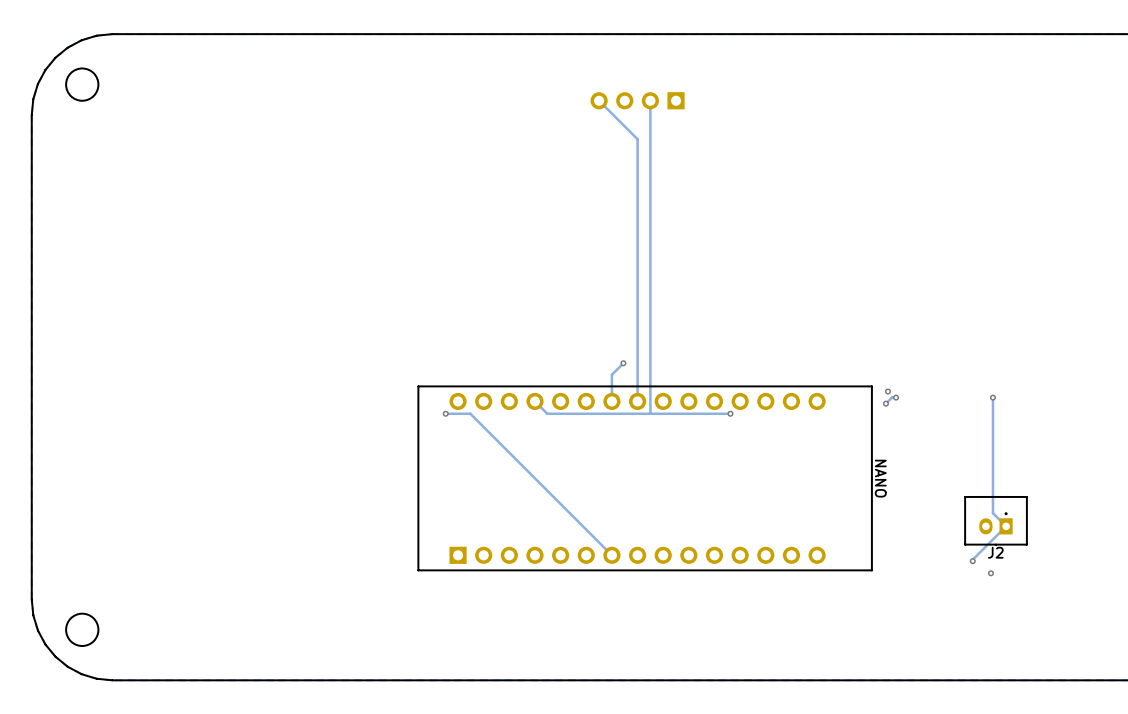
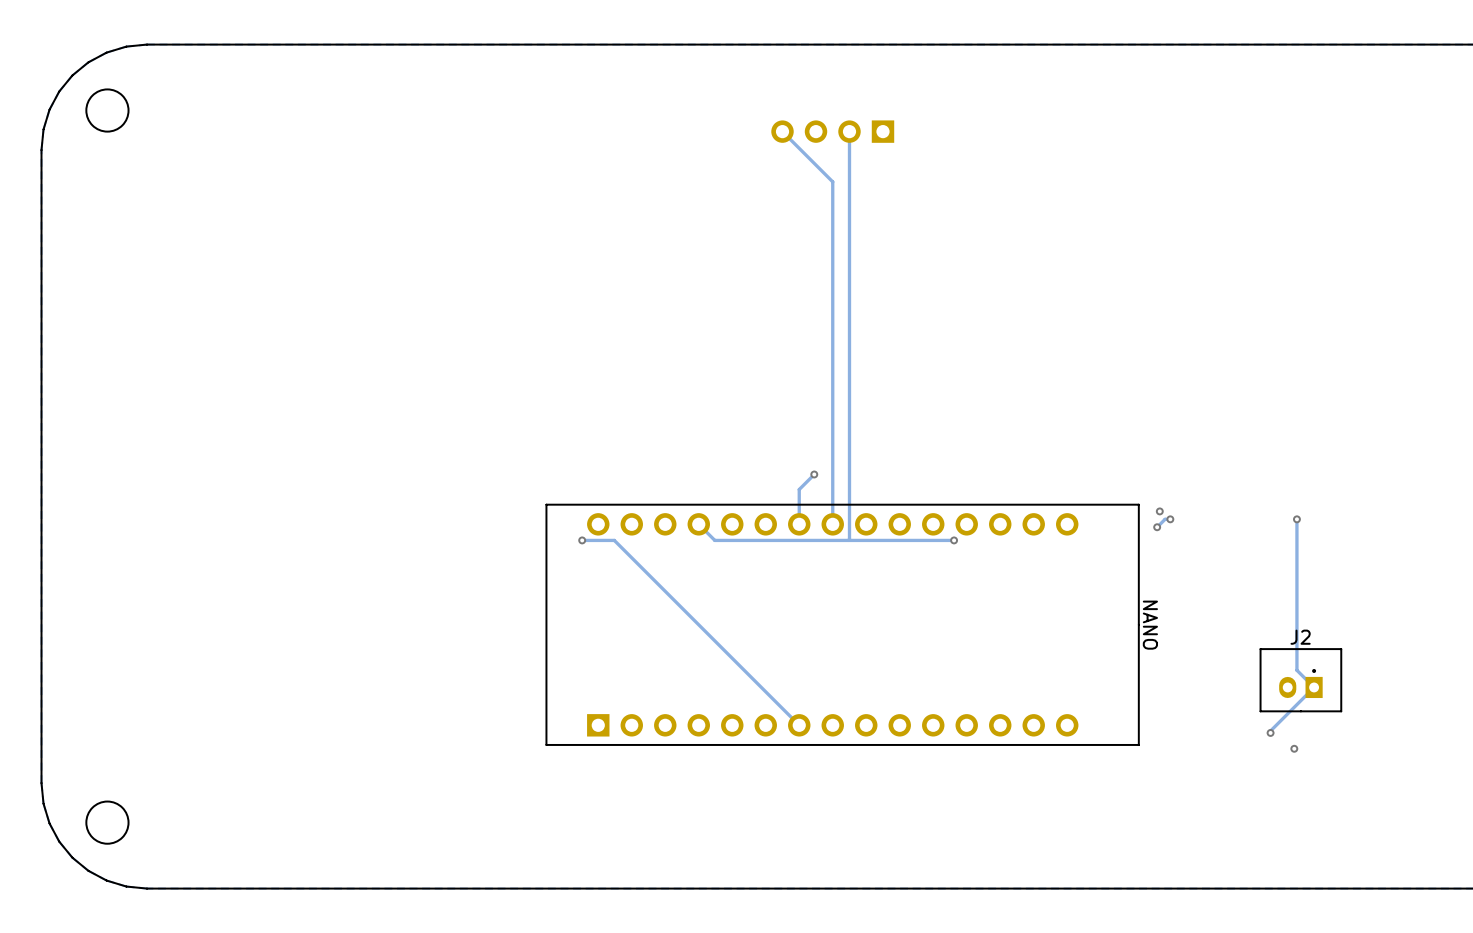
J2 name position: J2 (995, 552) -> J2 (1300, 637)

